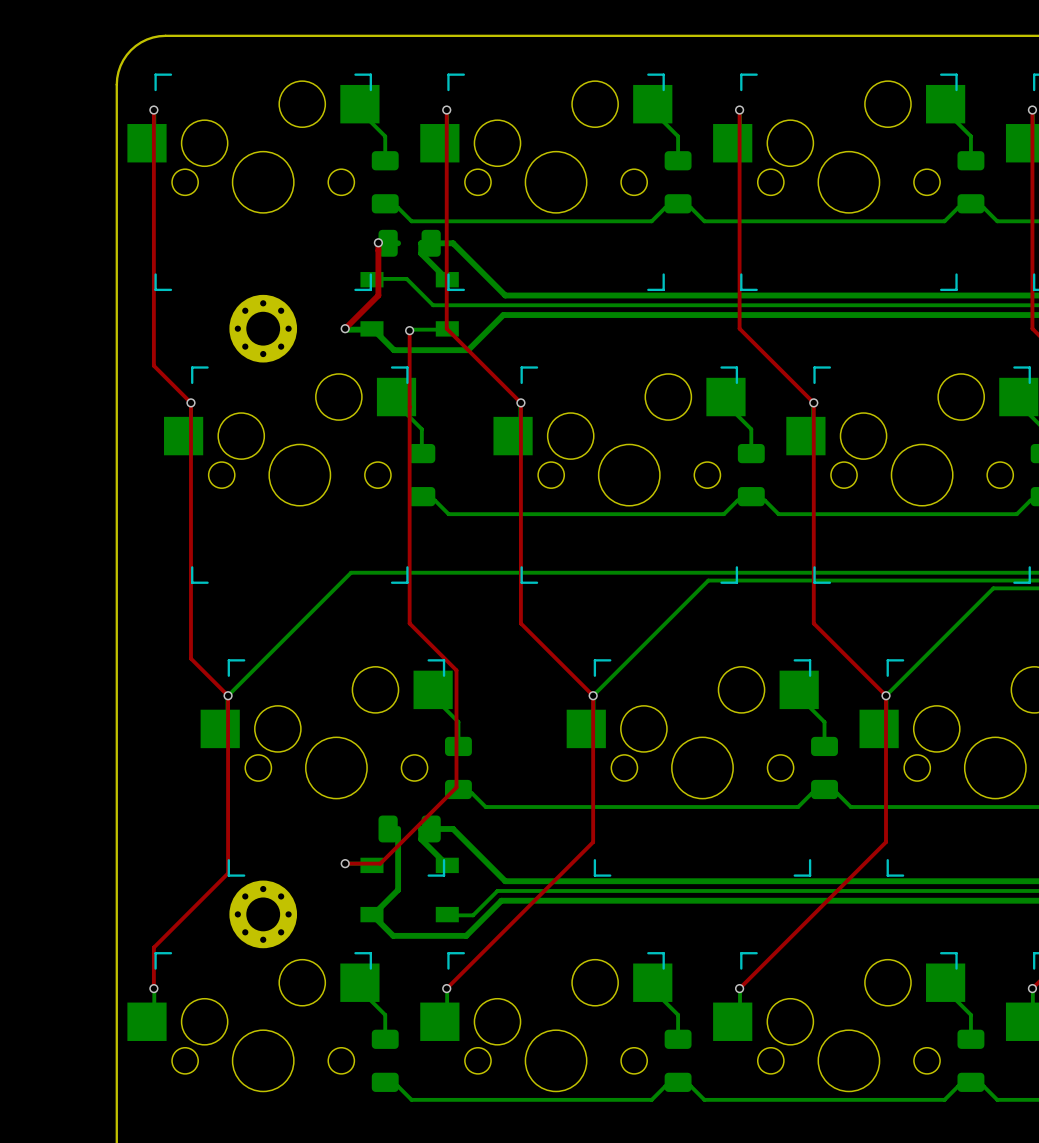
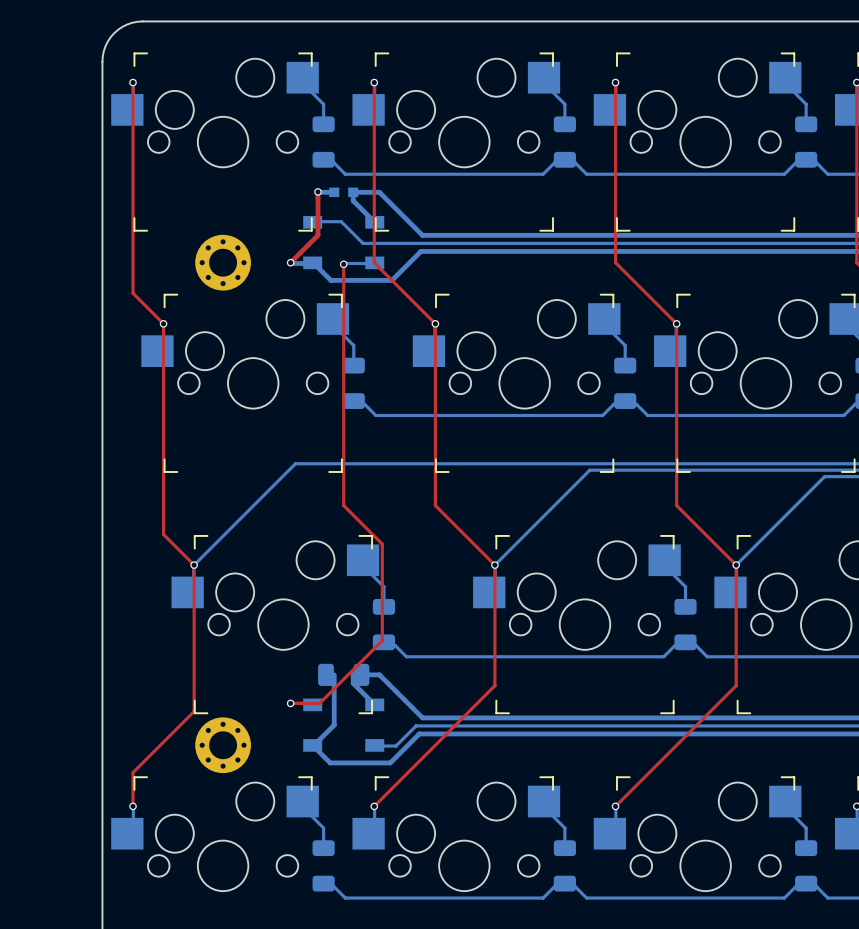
part footprint: [378, 229, 441, 257] -> [329, 187, 359, 198]

